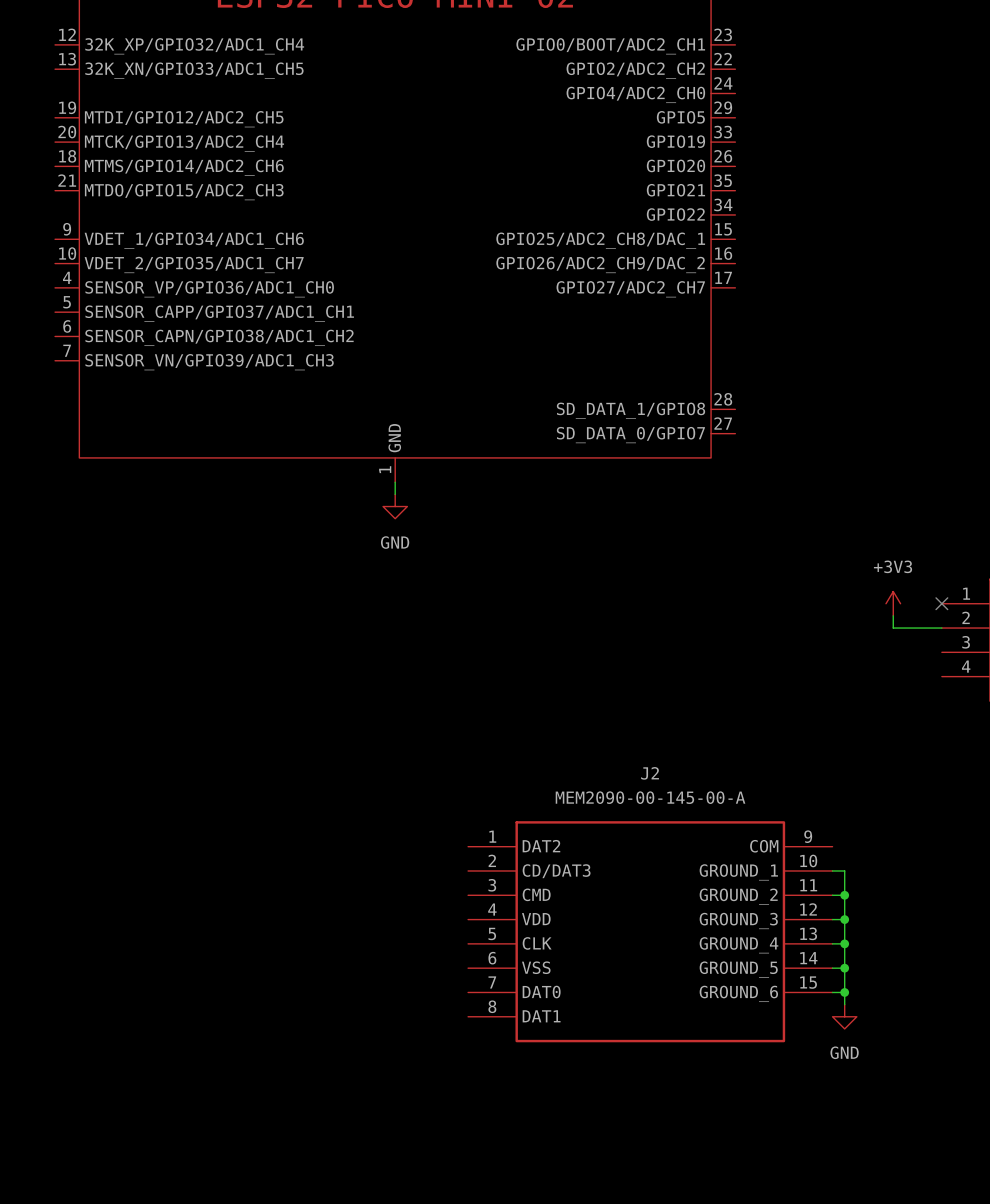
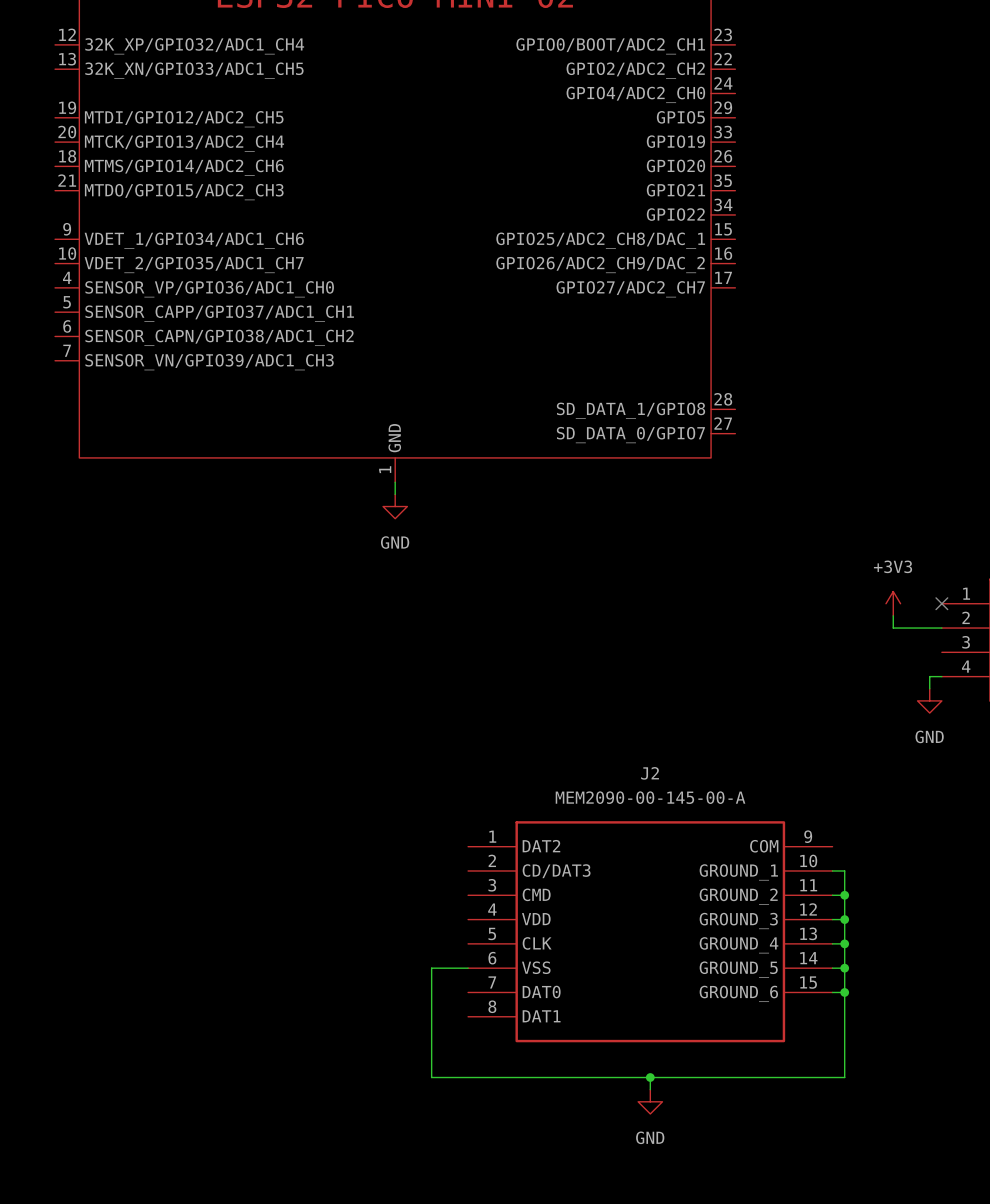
wire: none -> (941, 676) (929, 676) (929, 688)
power symbol: none -> GND (929, 700)
wire: none -> (468, 968) (431, 968) (431, 1077) (844, 1077) (844, 1004)
power symbol: GND (844, 1016) -> none
wire: none -> (650, 1077) (650, 1089)
junction: none -> (650, 1077)
power symbol: none -> GND (650, 1101)

